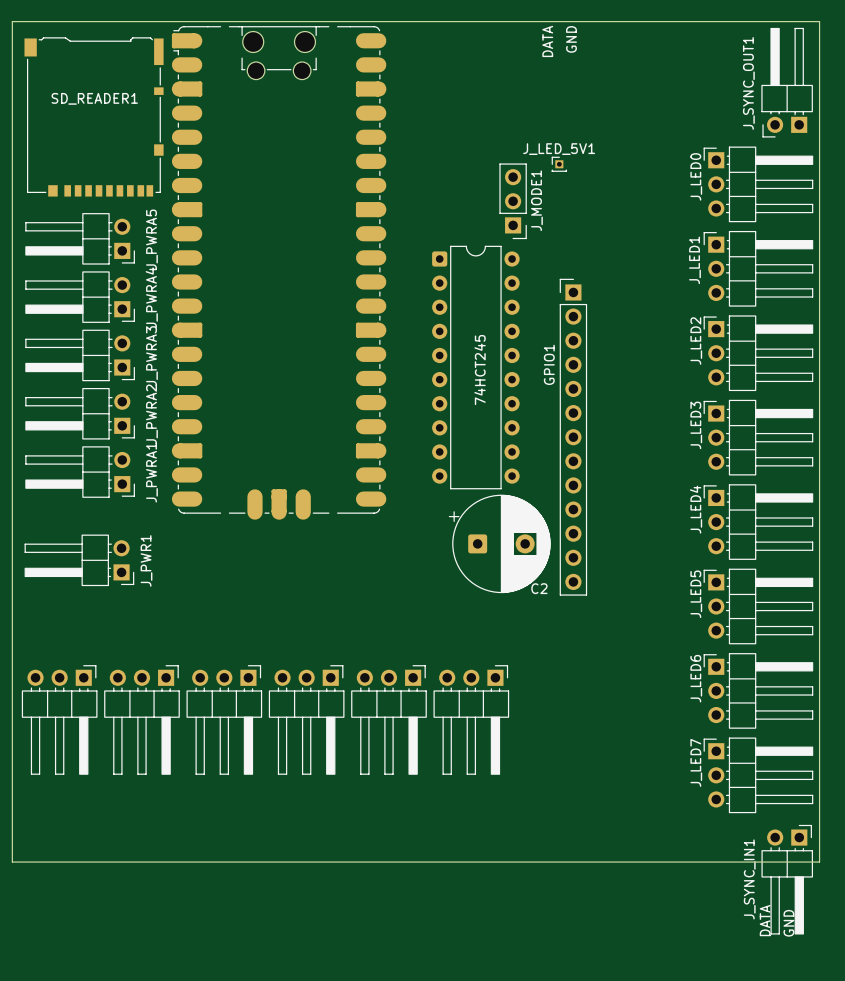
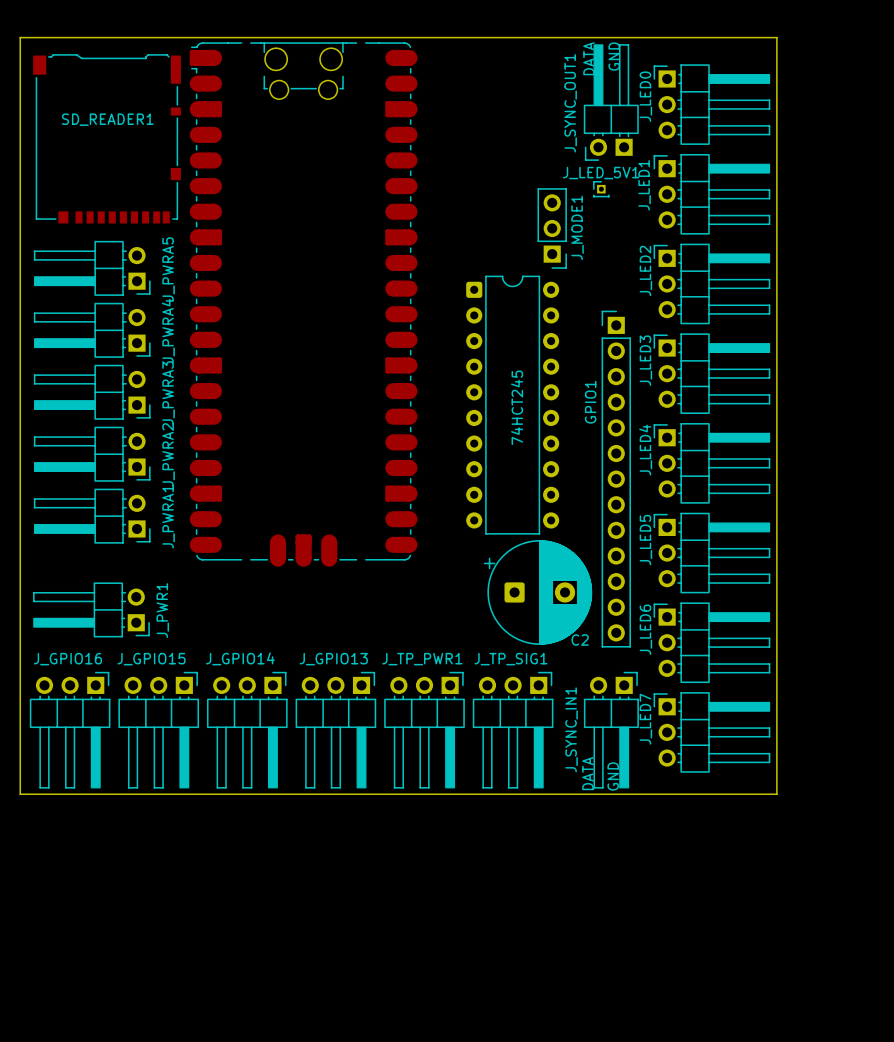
board edge: (724, 21) (819, 21) (819, 862) (12, 862) (12, 733) -> (776, 37) (776, 794) (20, 794)
J_SYNC_OUT1 position: (787, 82) -> (611, 102)
J_LED0 position: (758, 184) -> (711, 104)
J_LED1 position: (758, 268) -> (711, 194)
J_LED2 position: (758, 353) -> (711, 283)
J_LED3 position: (758, 437) -> (711, 373)
J_LED4 position: (758, 522) -> (711, 463)
J_LED5 position: (758, 606) -> (711, 553)
J_GPIO16: none -> (70, 730)
J_GPIO15: none -> (158, 730)
J_GPIO14: none -> (247, 730)
J_GPIO13: none -> (335, 730)
J_TP_PWR1: none -> (424, 730)
J_TP_SIG1: none -> (513, 730)
J_LED6 position: (758, 690) -> (711, 642)
text: none -> DATA (587, 773)
text: none -> GND (613, 776)
part: (59, 719) -> none
part: (141, 719) -> none
part: (224, 719) -> none
part: (306, 719) -> none
part: (388, 719) -> none
part: (471, 719) -> none
J_LED7 position: (758, 775) -> (711, 732)
J_SYNC_IN1 position: (787, 879) -> (611, 730)
text: DATA (765, 920) -> none
text: GND (788, 923) -> none

